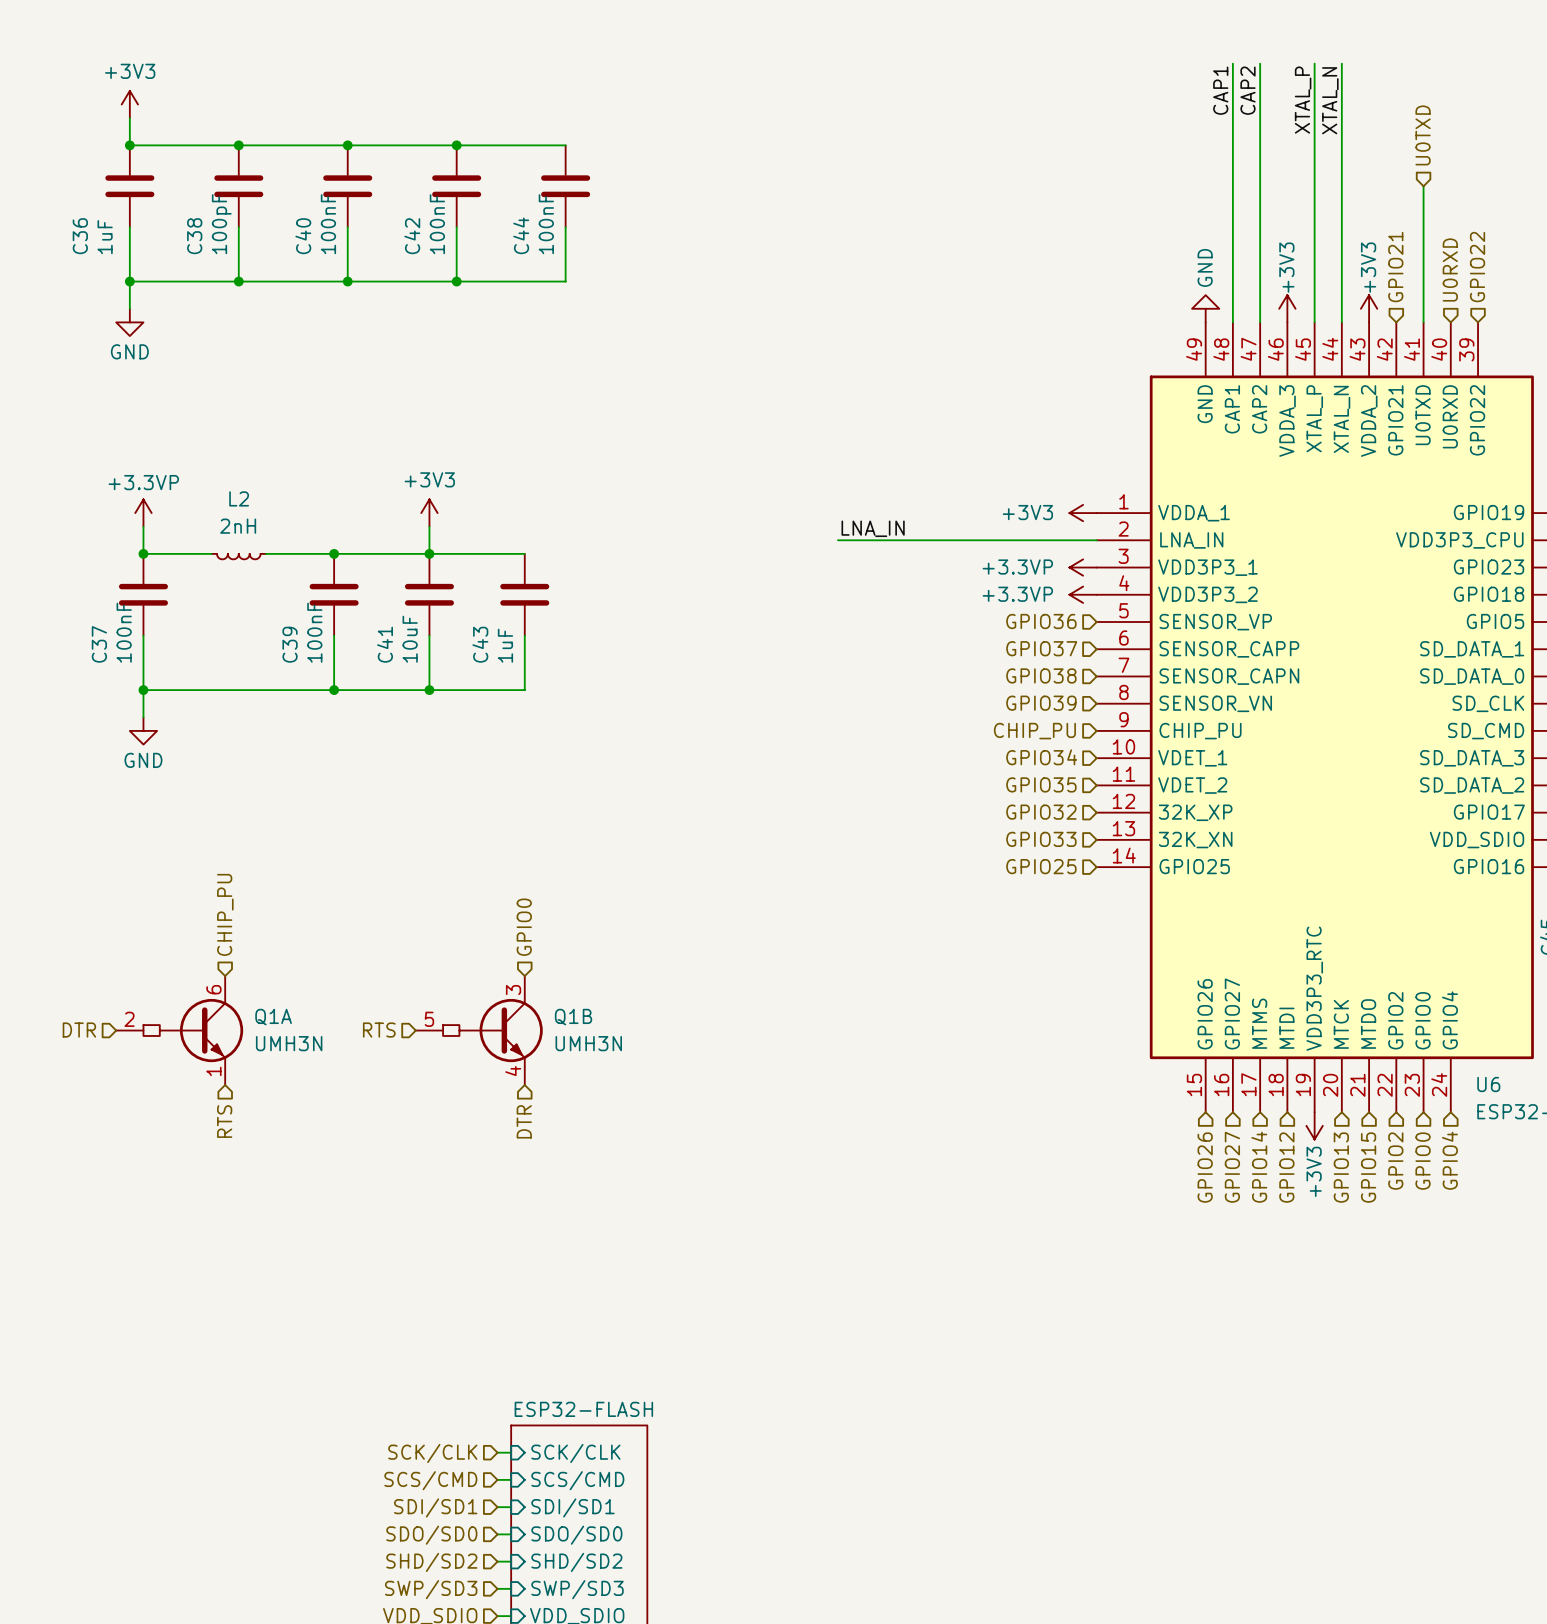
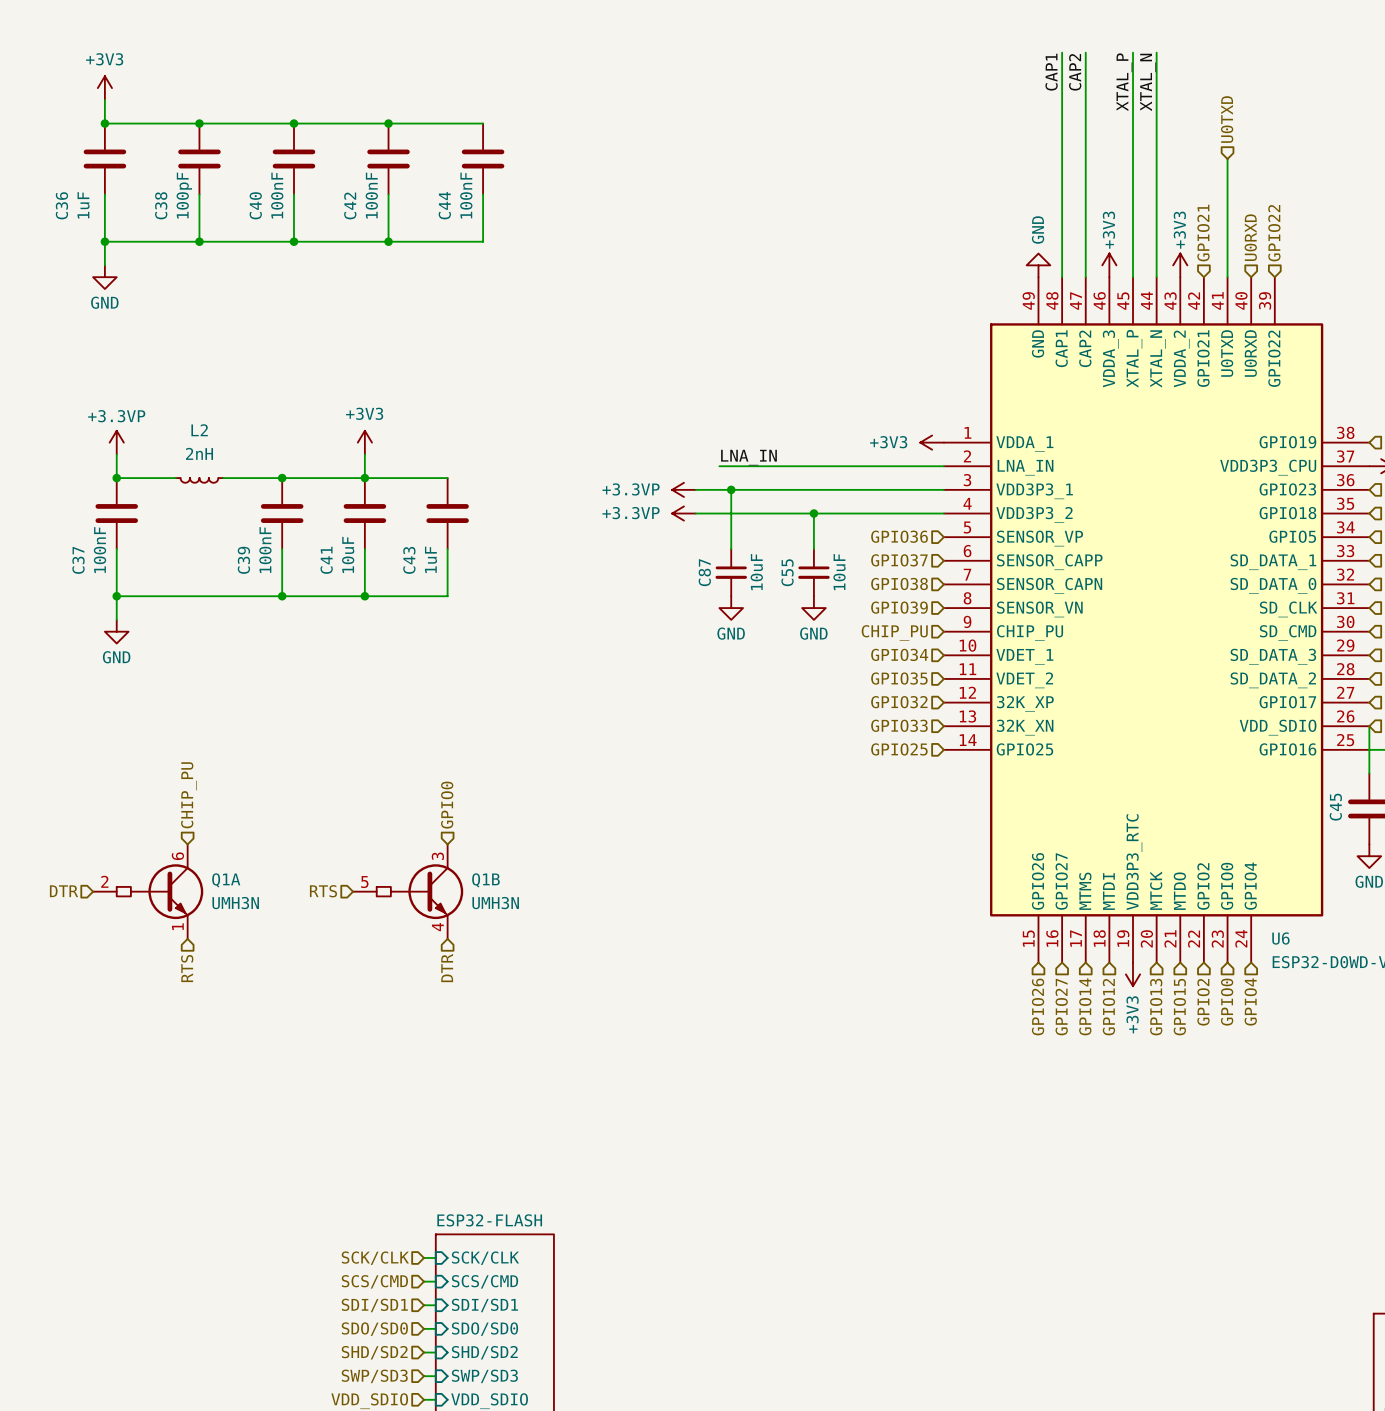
power symbol: none -> +3.3VP (683, 489)
wire: none -> (695, 489) (943, 489)
wire: none -> (731, 489) (731, 548)
junction: none -> (731, 489)
power symbol: +3.3VP (1083, 567) -> none
power symbol: none -> +3.3VP (683, 513)
wire: none -> (695, 513) (943, 513)
wire: none -> (813, 513) (813, 548)
junction: none -> (813, 513)
power symbol: +3.3VP (1083, 594) -> none
C87: none -> 10uF (731, 572)
C55: none -> 10uF (813, 572)
power symbol: none -> GND (731, 608)
power symbol: none -> GND (813, 608)

